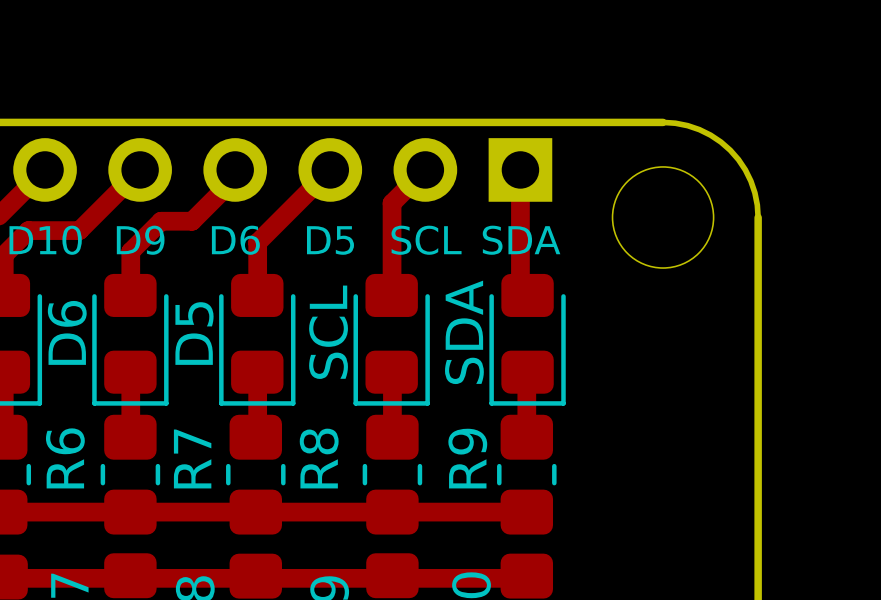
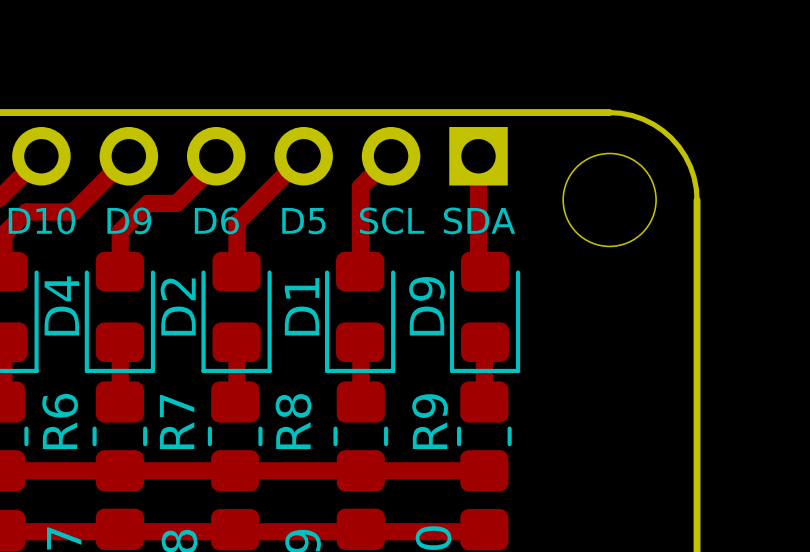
D6 name: D6 (67, 332) -> D4 (61, 305)
SCL name: SCL (328, 332) -> D1 (302, 306)
SDA name: SDA (464, 332) -> D9 (426, 306)
D5 name: D5 (194, 333) -> D2 (178, 306)

